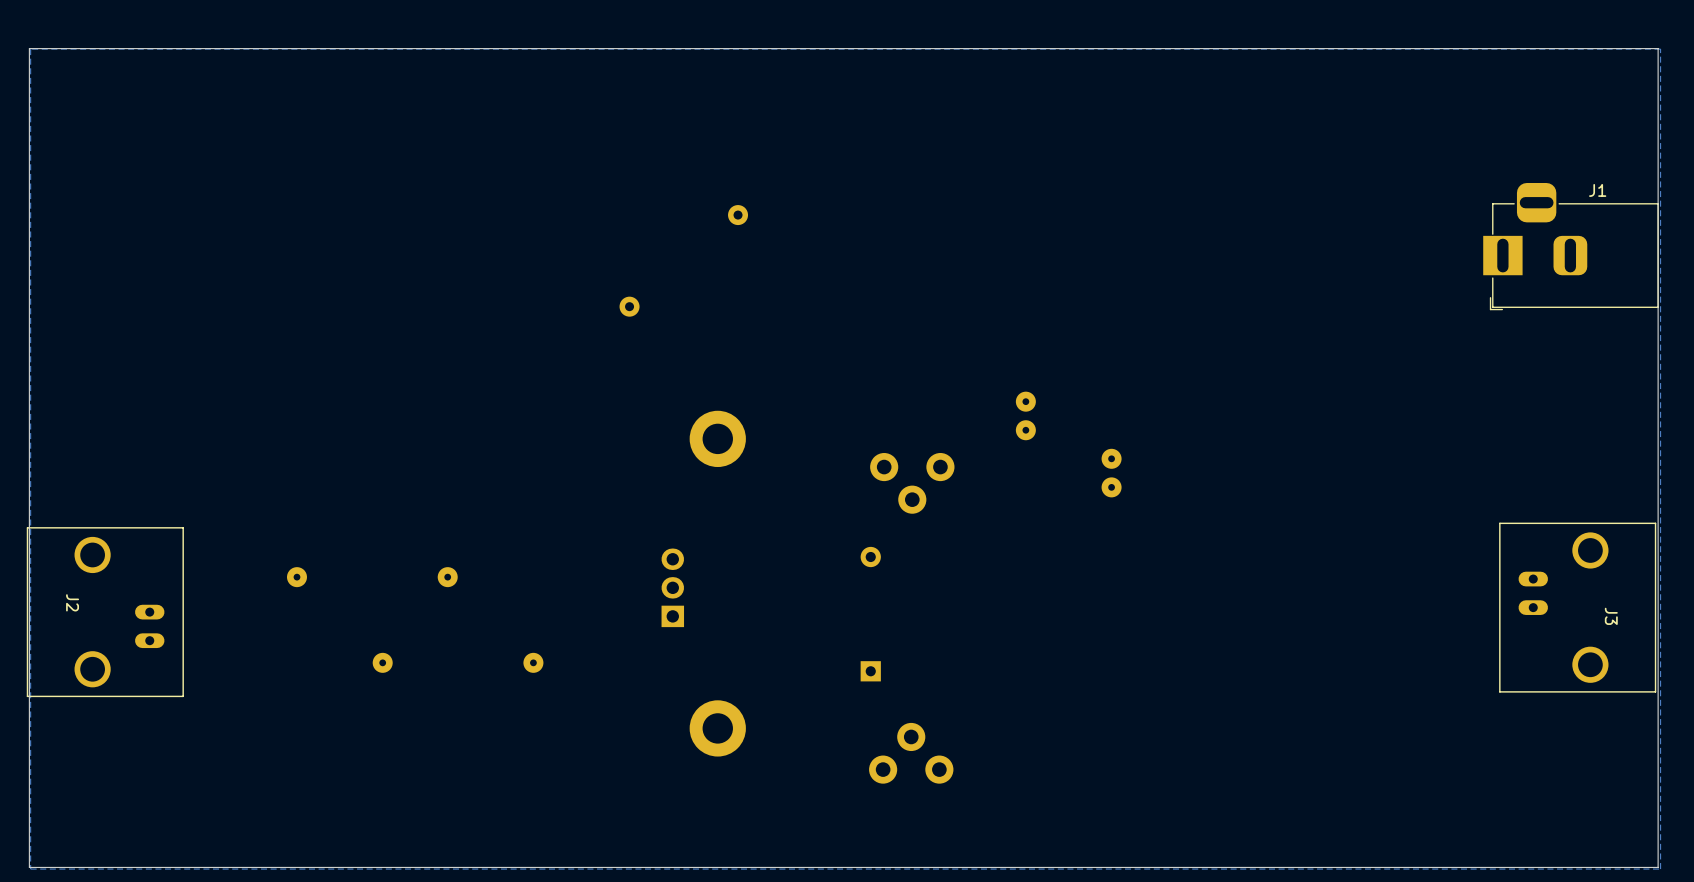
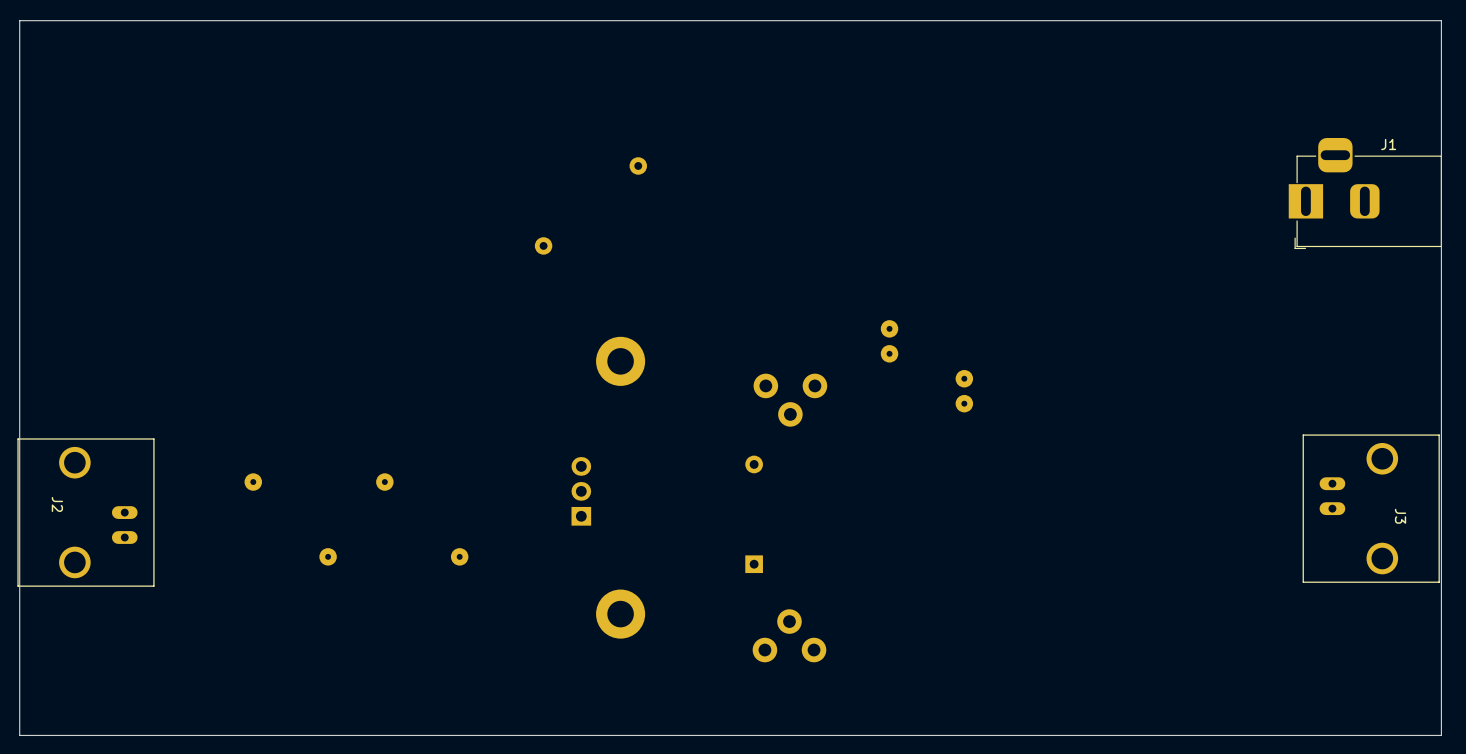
zone outline: (1660, 49) (1660, 869) (30, 869) (30, 49) (1660, 49) -> none

